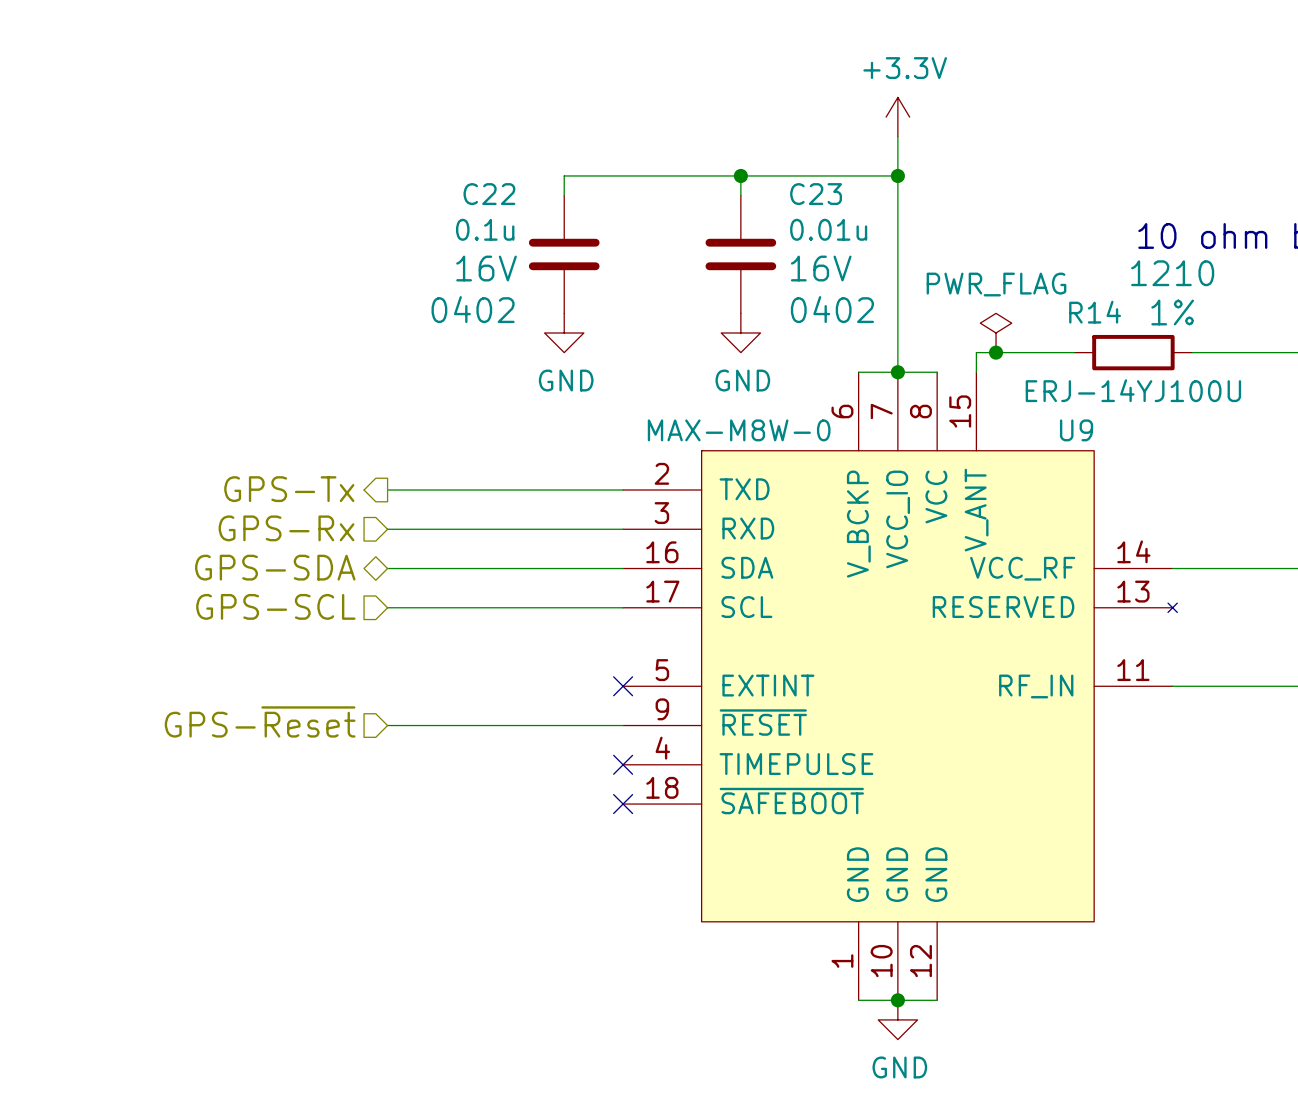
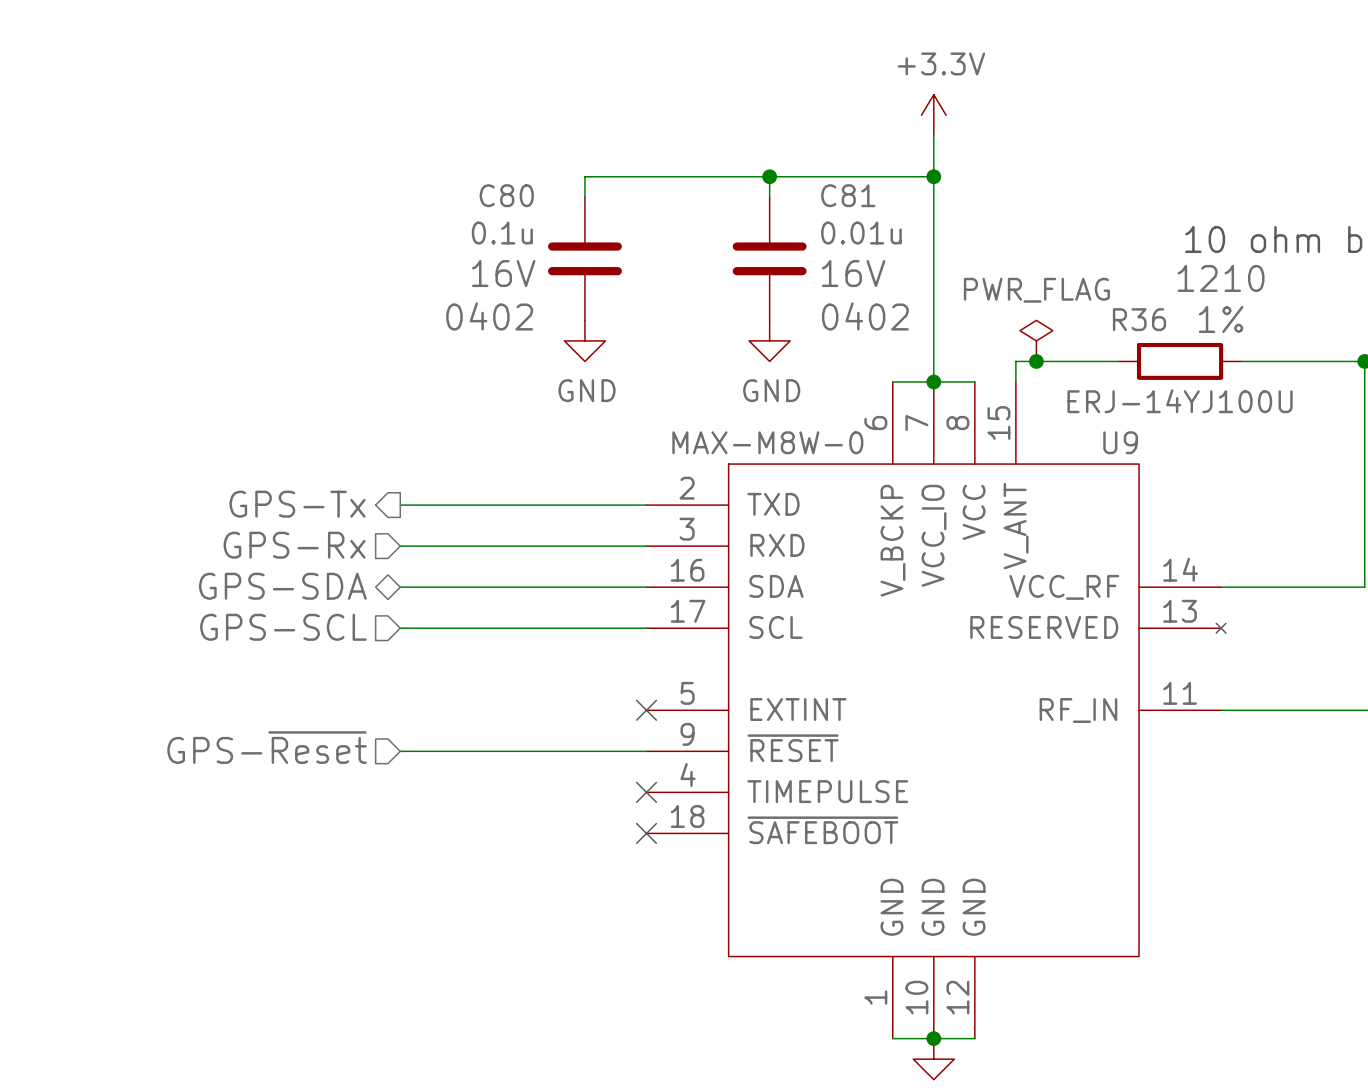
C22 name: C22 (489, 194) -> C80 (506, 195)
C23 name: C23 (816, 194) -> C81 (848, 195)
R14 name: R14 (1095, 312) -> R36 (1139, 319)

